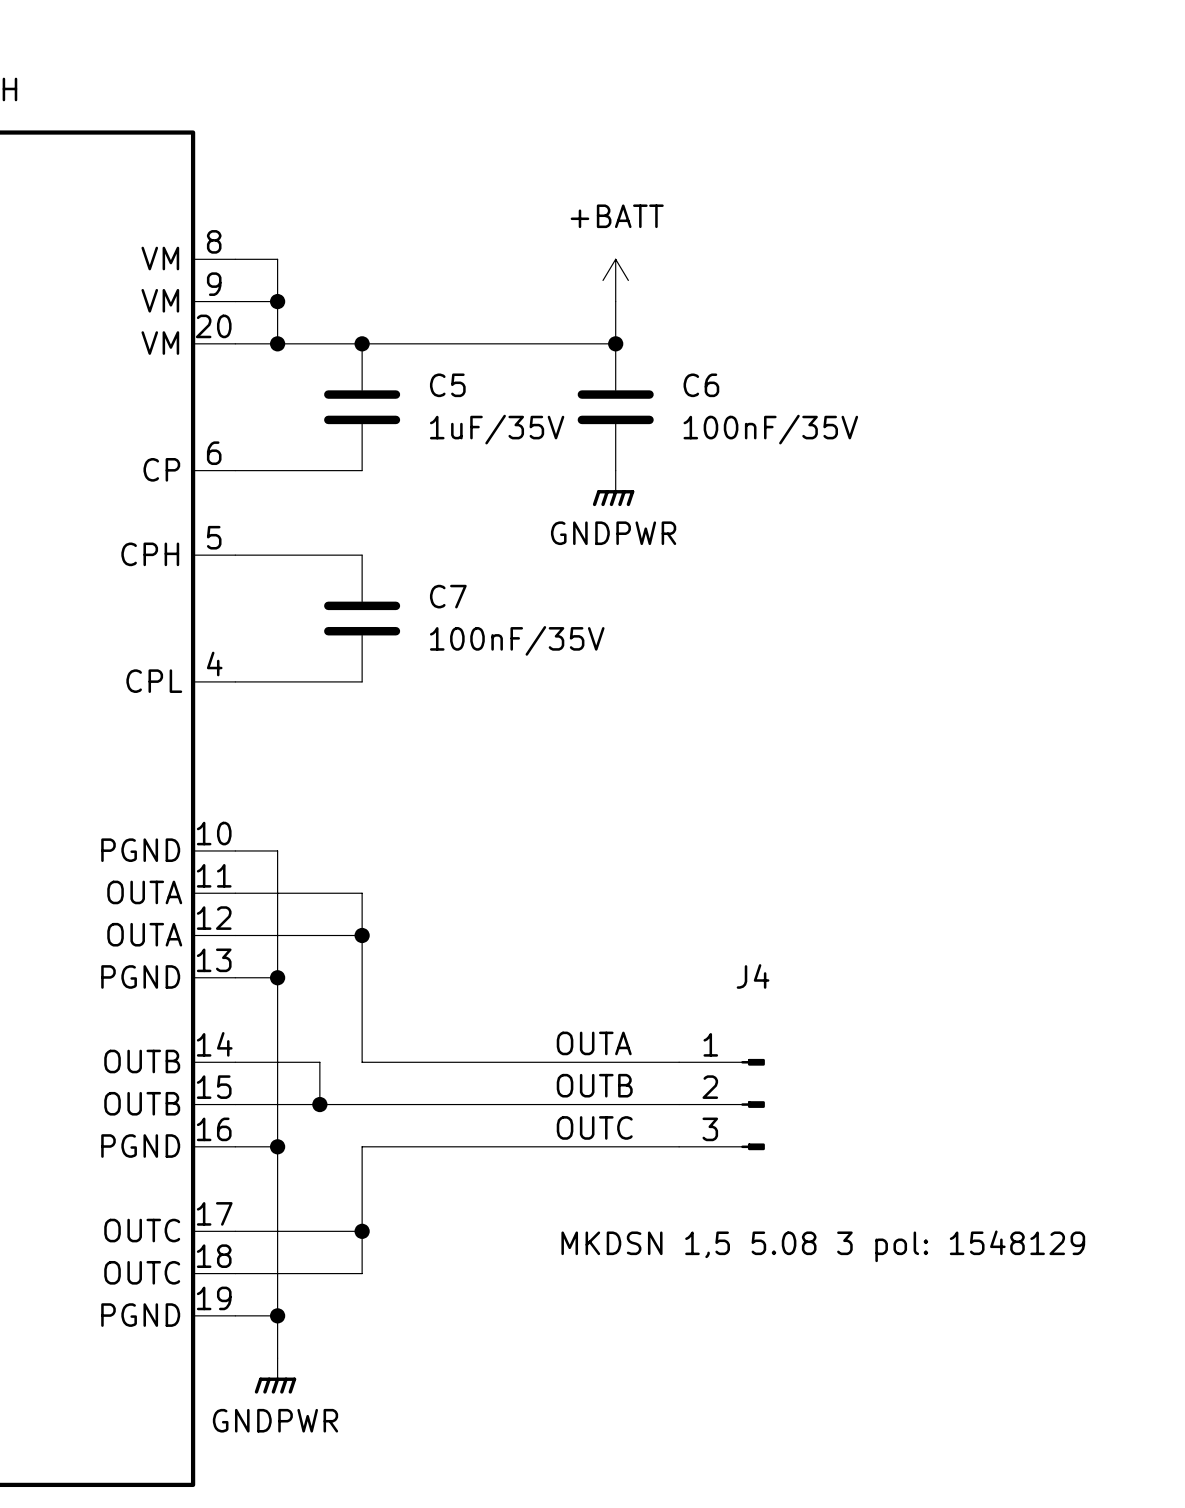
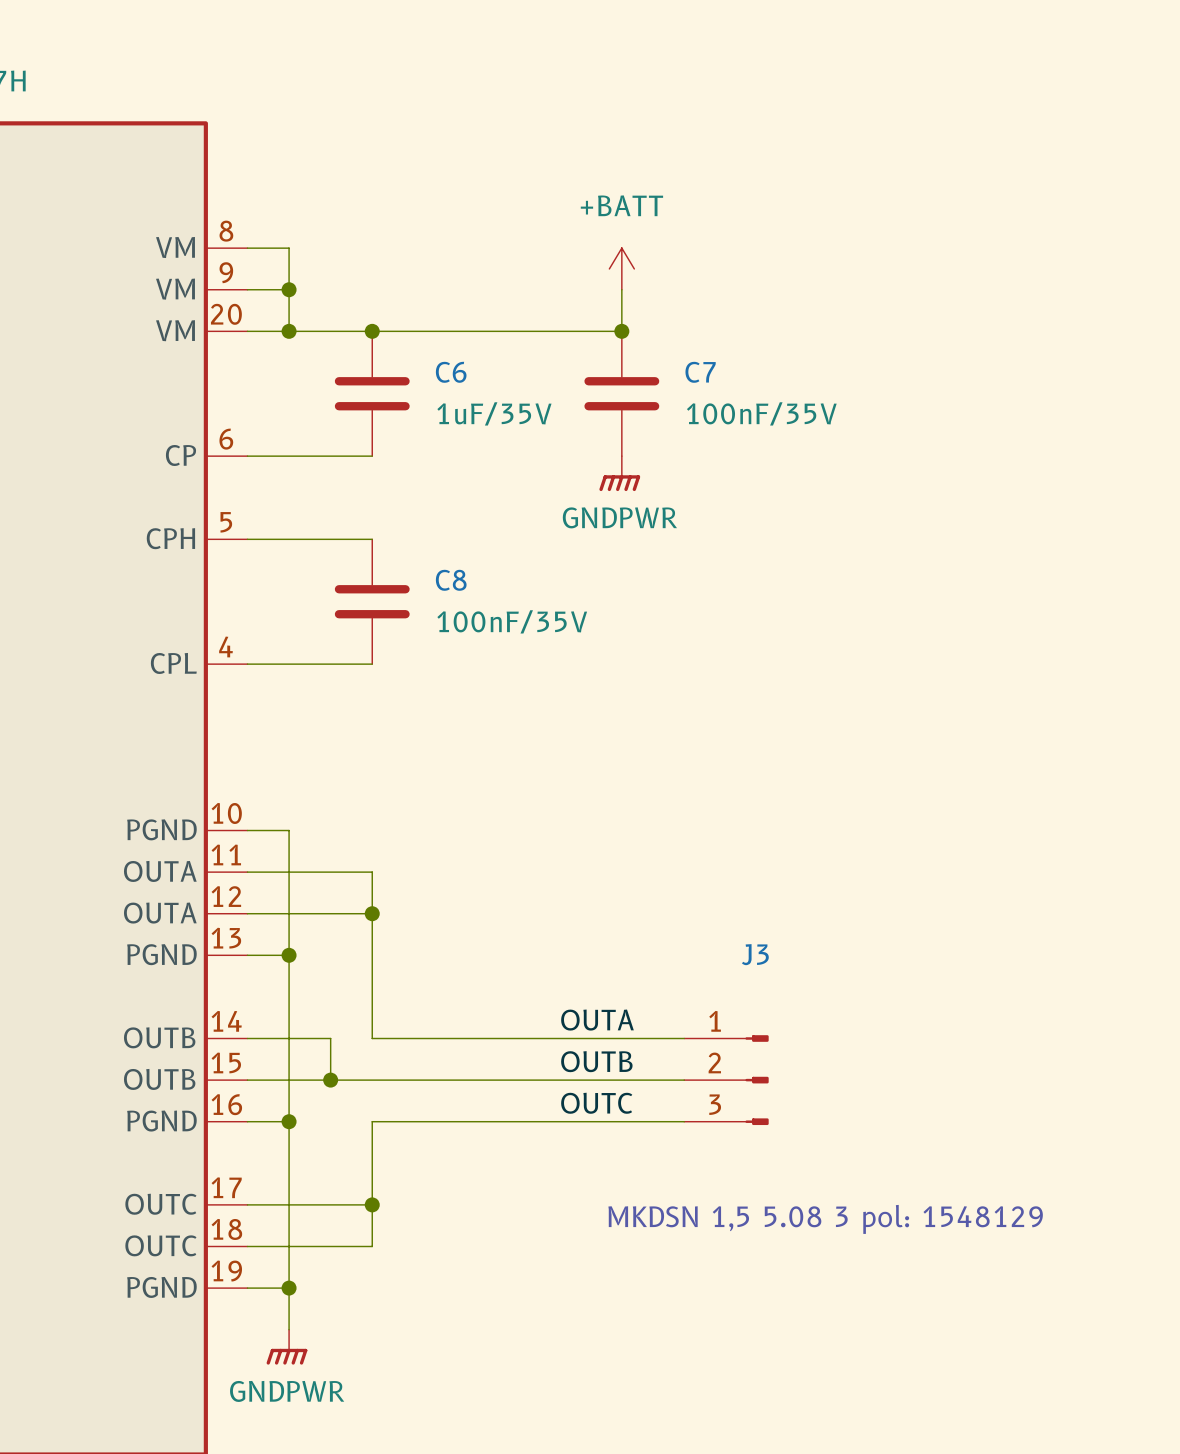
C5 name: C5 (447, 385) -> C6 (451, 372)
C6 name: C6 (701, 385) -> C7 (700, 372)
C7 name: C7 (448, 596) -> C8 (451, 580)
J4 name: J4 (753, 976) -> J3 (755, 954)

